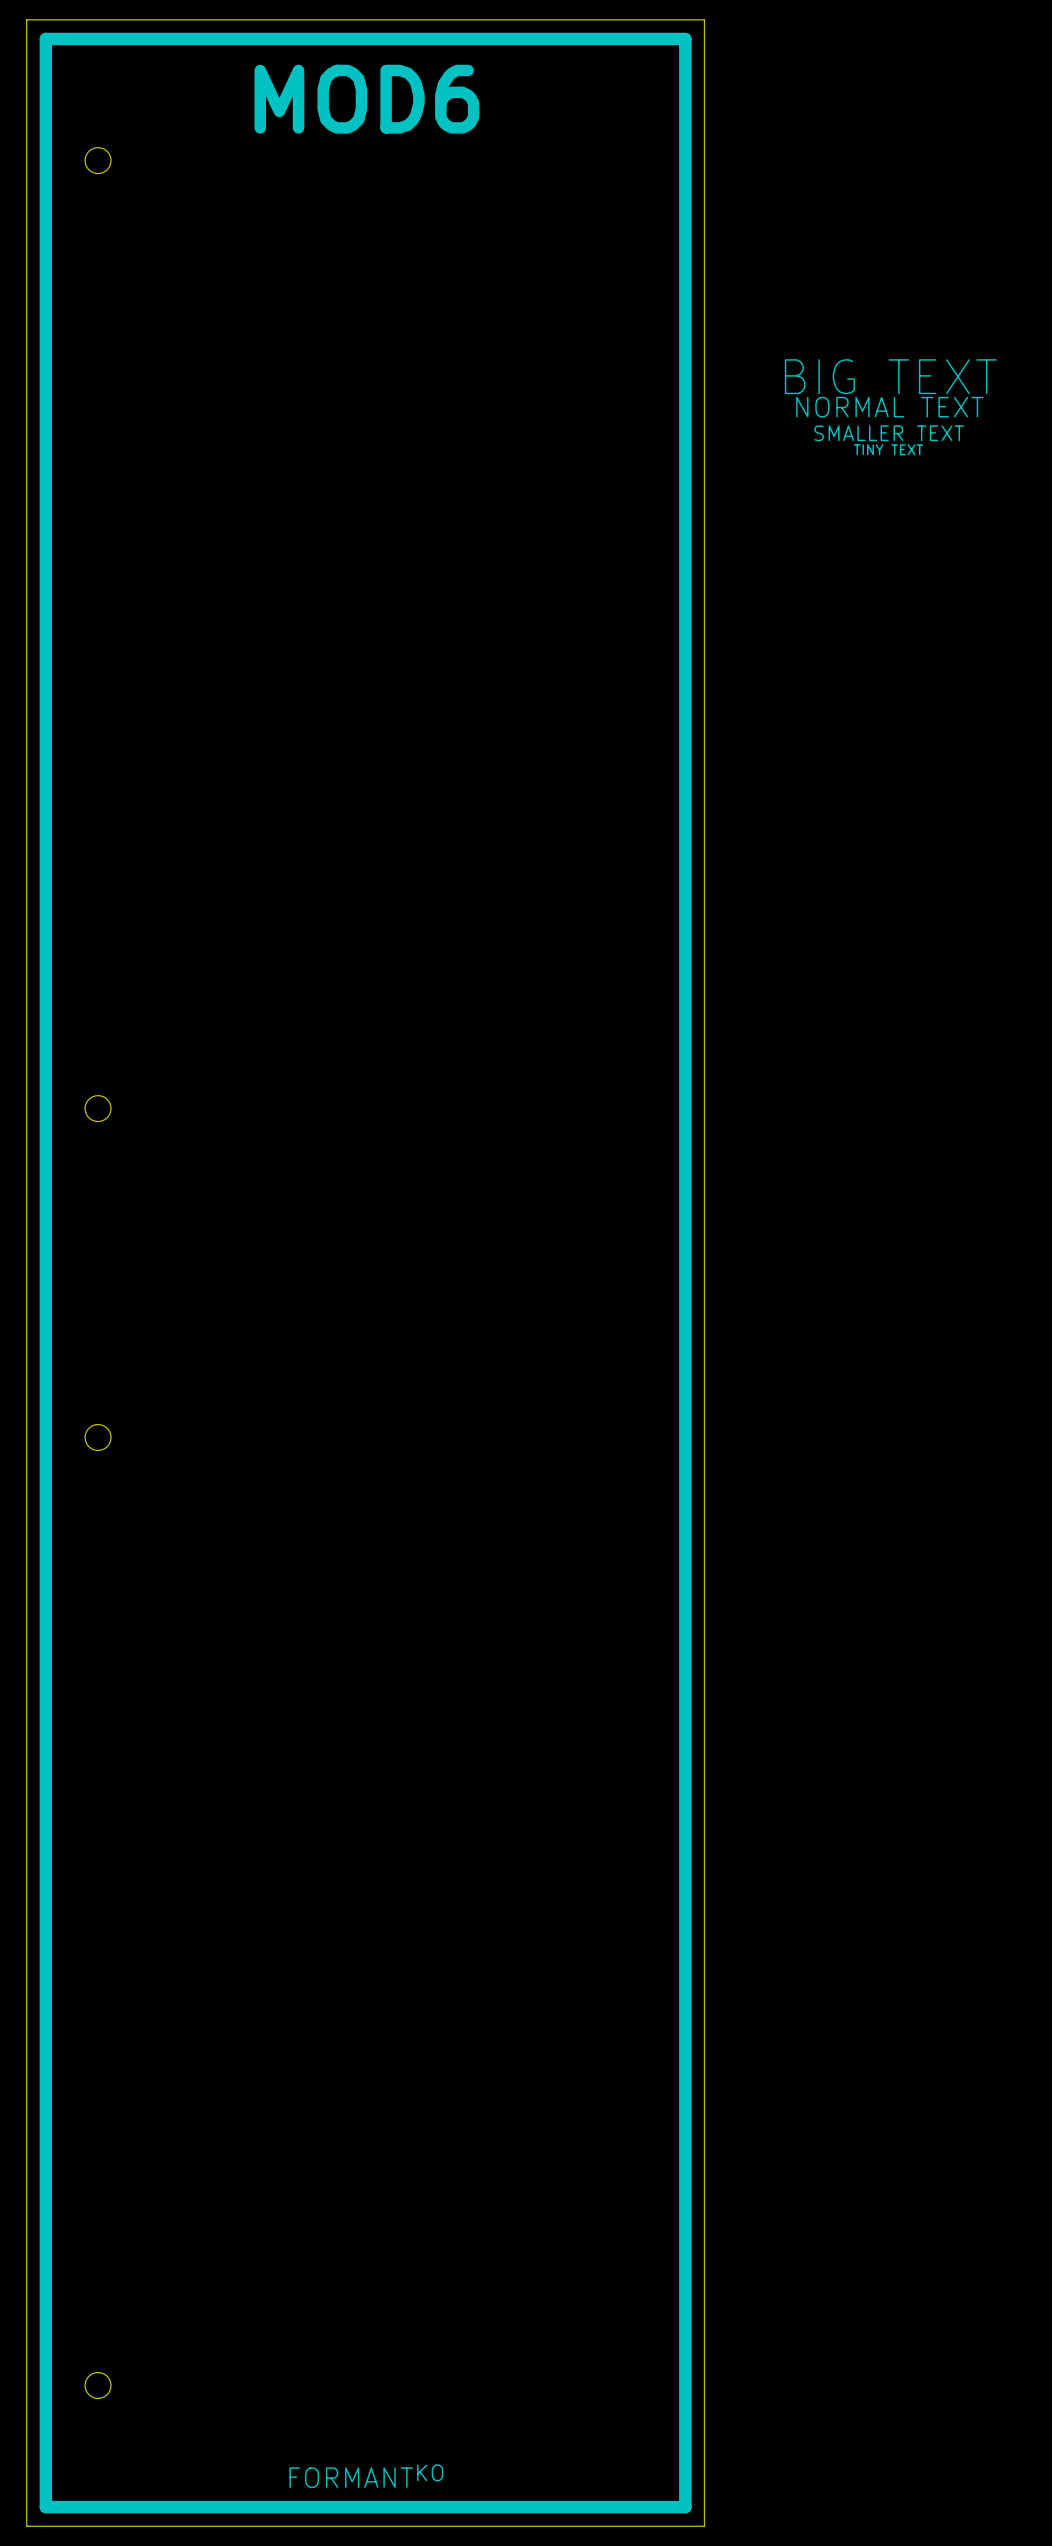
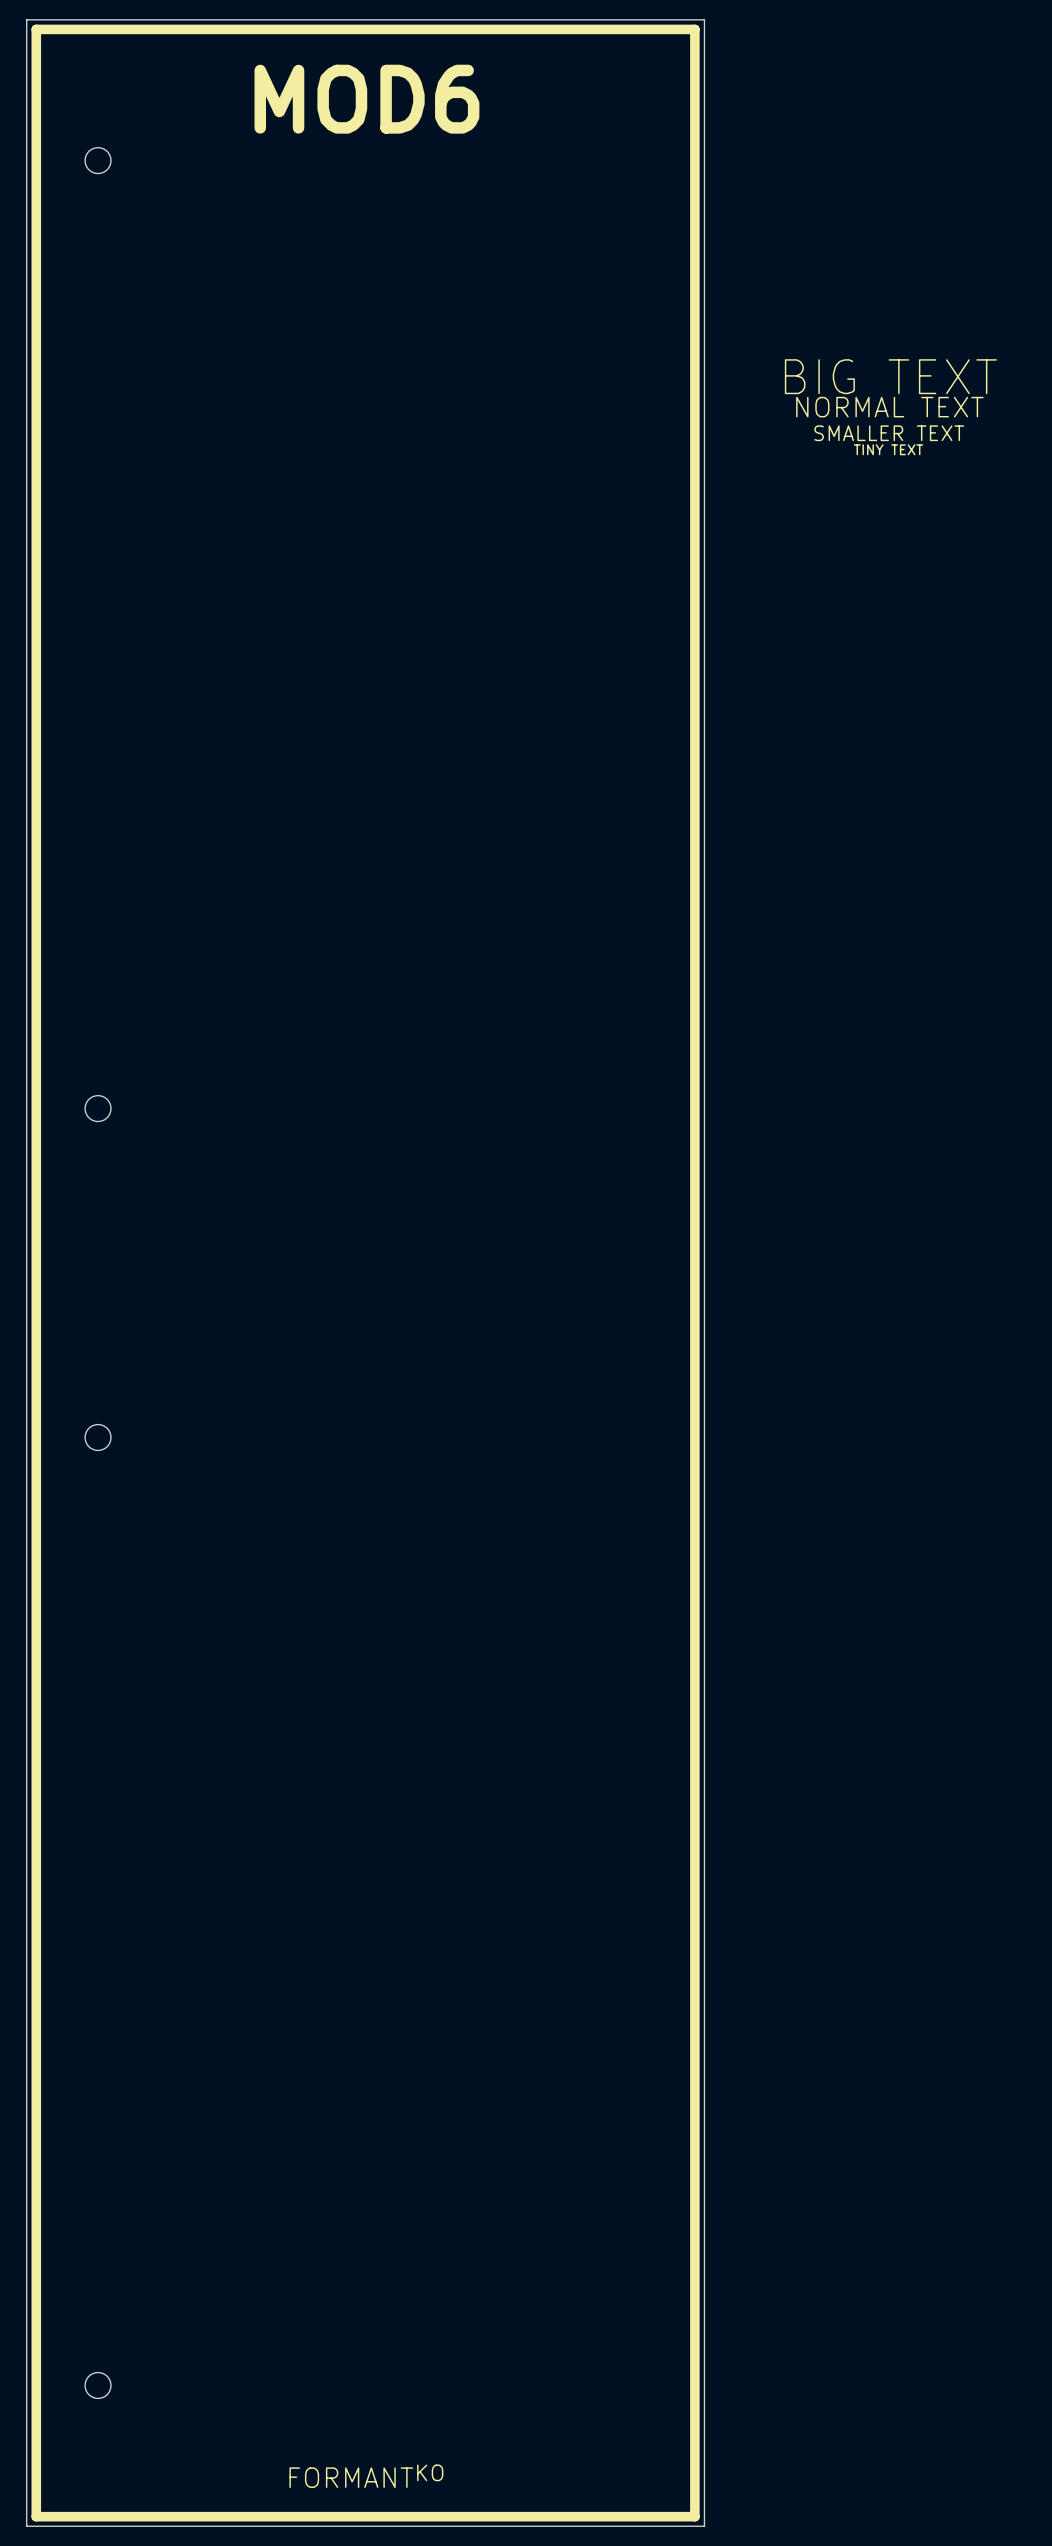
line: (45, 38) (685, 38) (685, 2507) (45, 2507) (45, 38) -> (36, 29) (36, 2516) (694, 2516) (694, 29) (36, 29)

